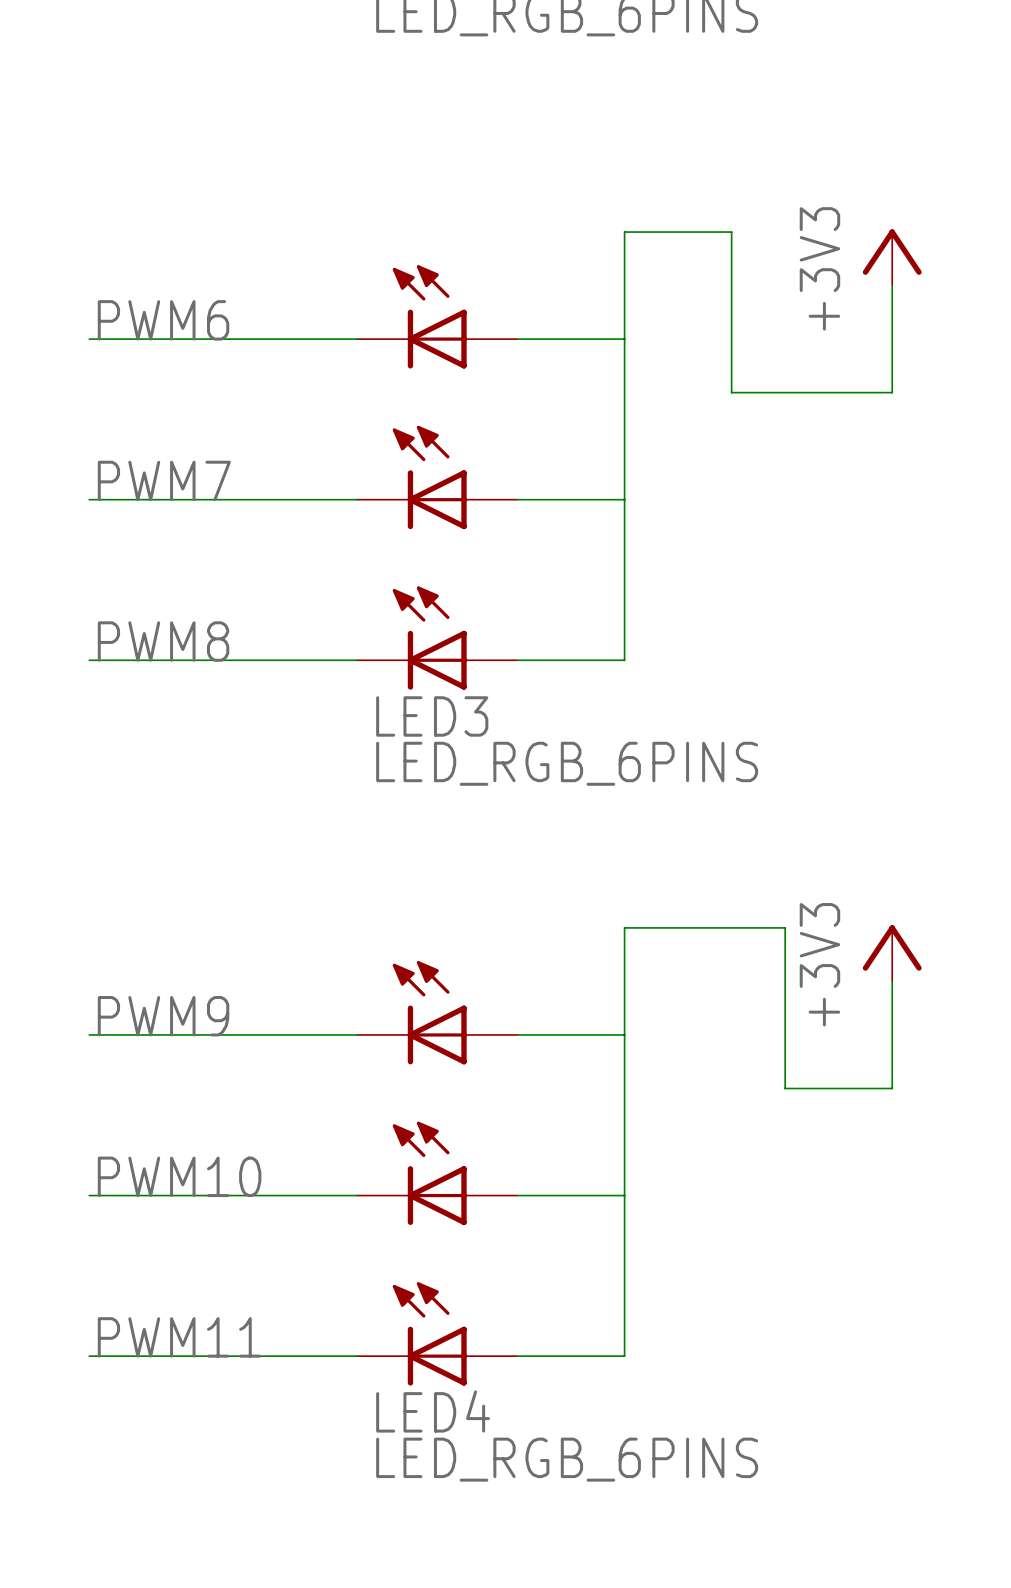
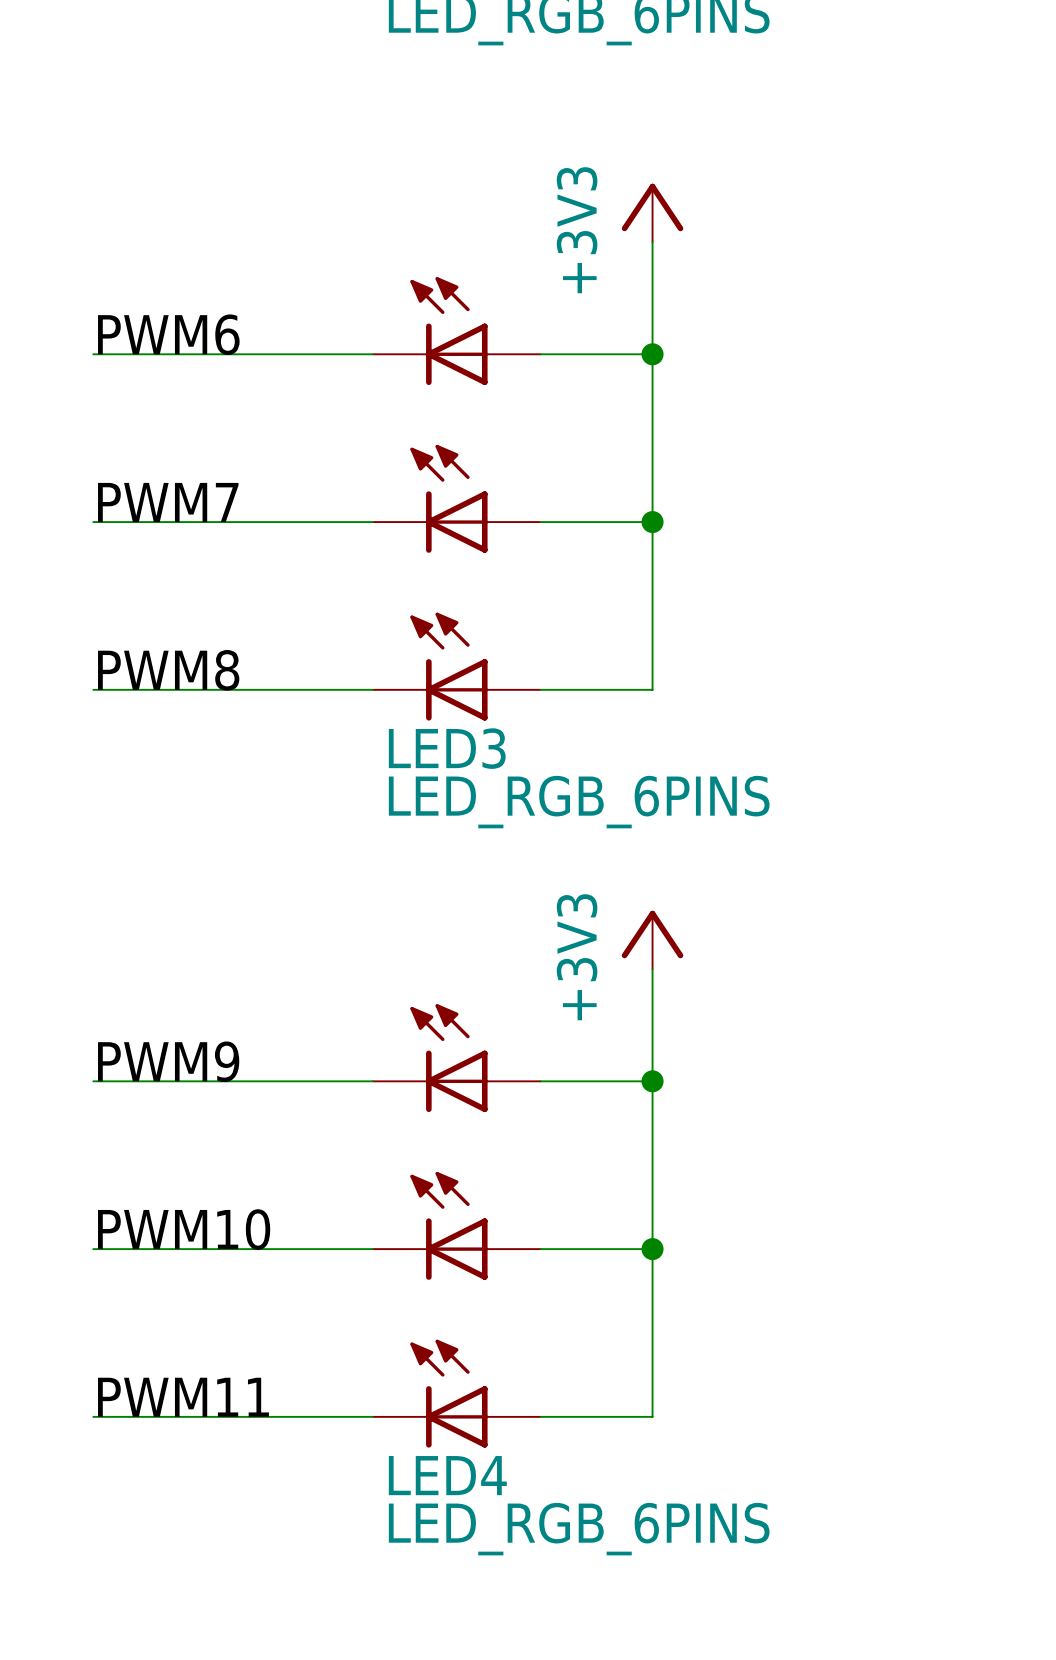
wire: (624, 232) (731, 232) (731, 392) (892, 392) (892, 285) -> none
power symbol position: +3V3 (892, 257) -> +3V3 (652, 213)
junction: none -> (652, 354)
junction: none -> (652, 522)
wire: (624, 927) (785, 927) (785, 1088) (892, 1088) (892, 981) -> none
power symbol position: +3V3 (892, 953) -> +3V3 (652, 940)
junction: none -> (652, 1081)
junction: none -> (652, 1249)

